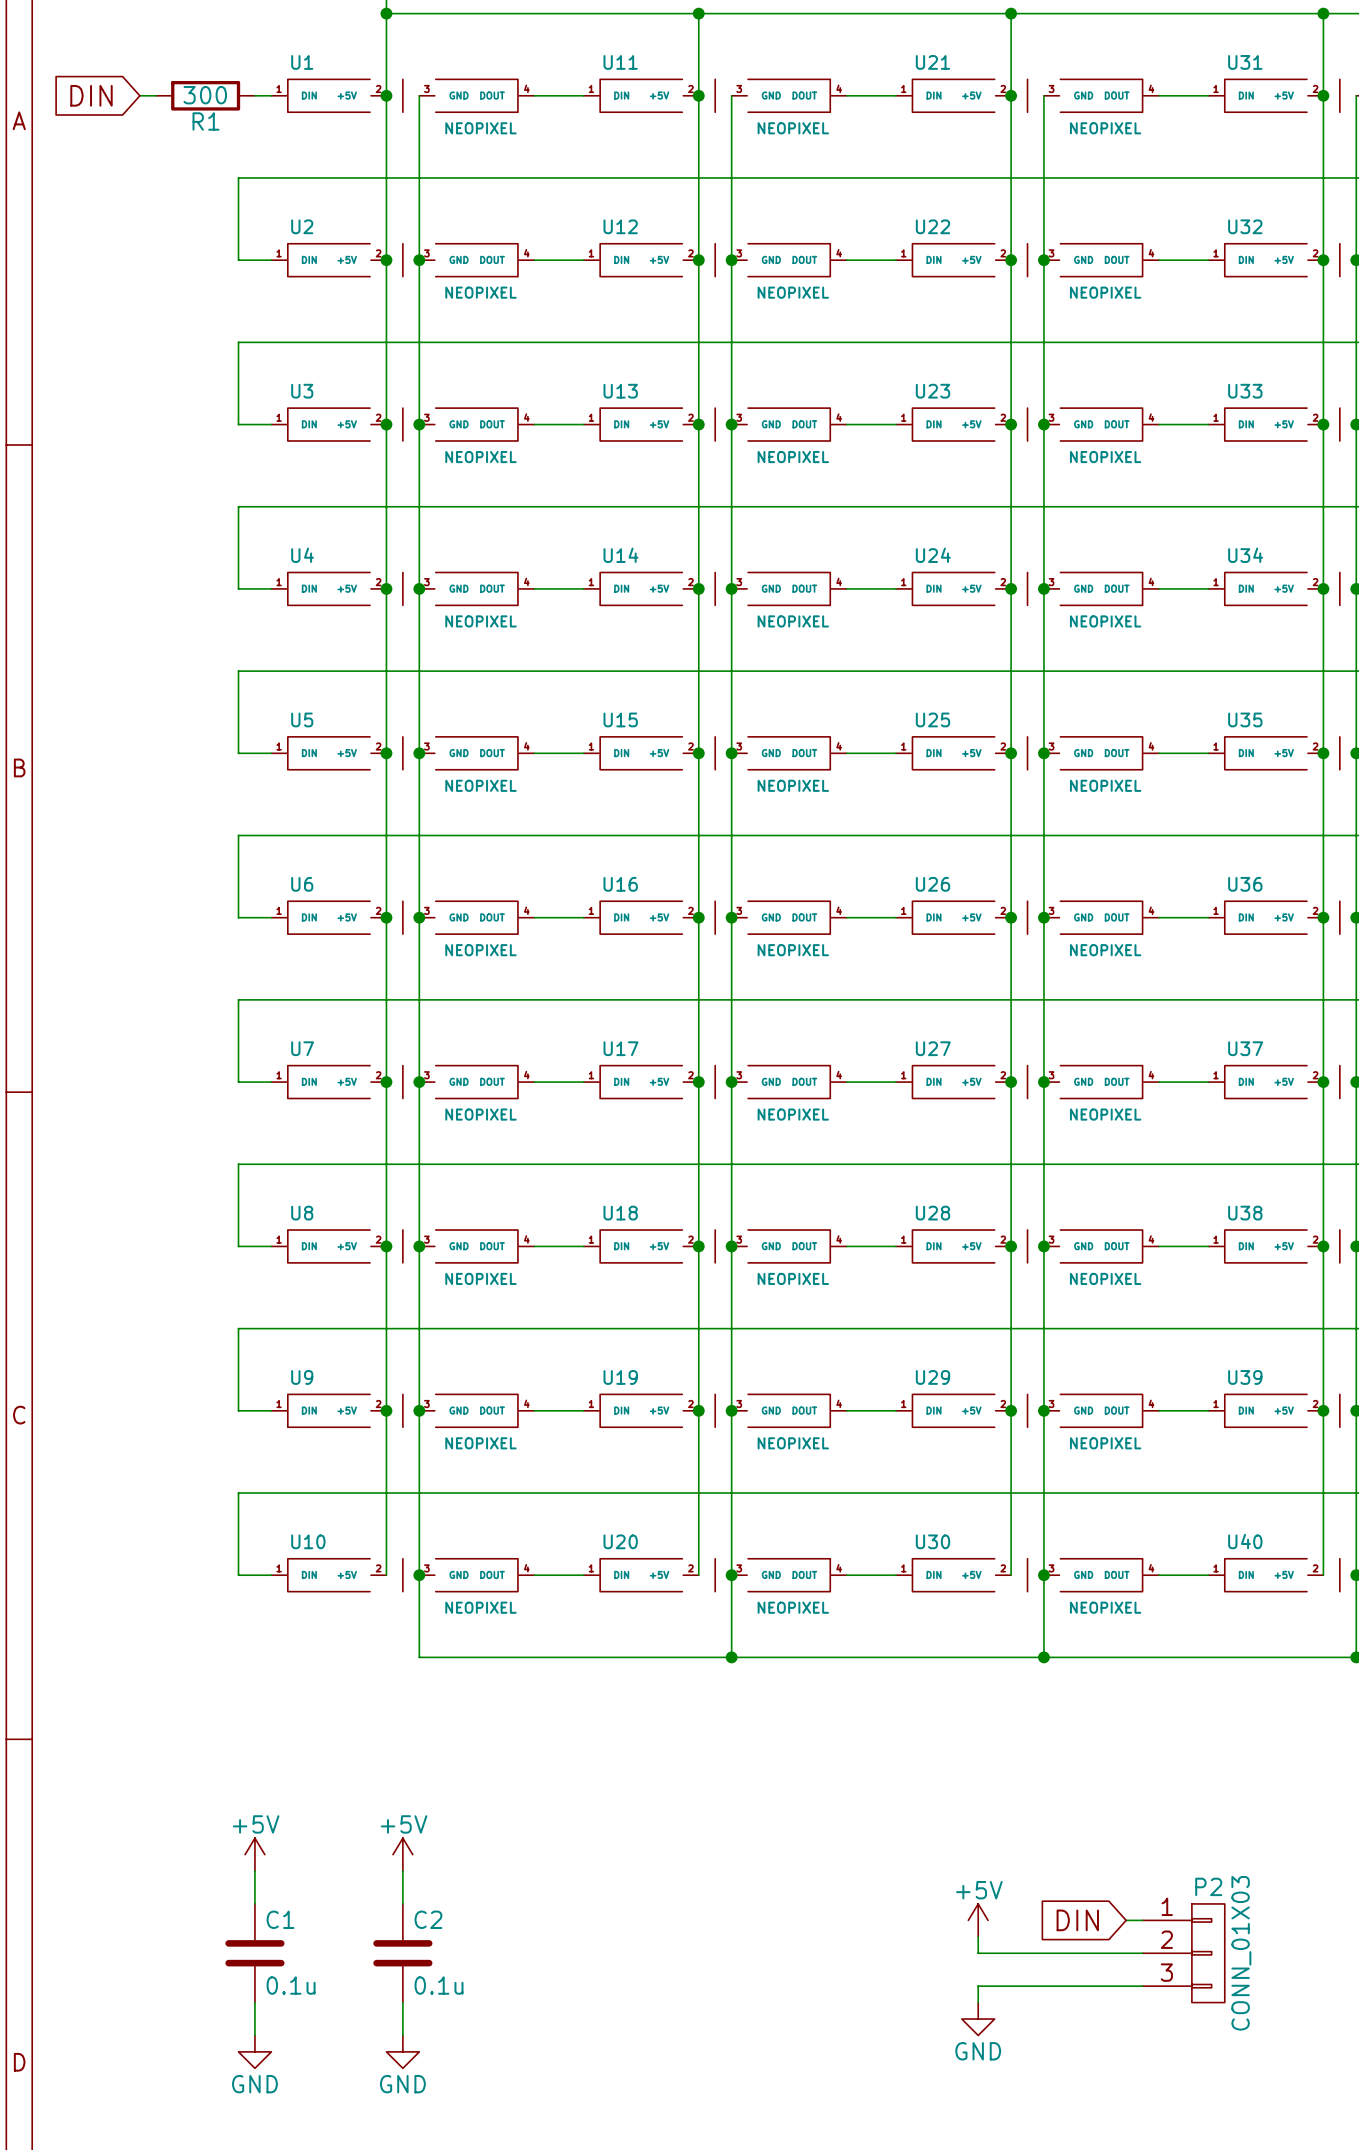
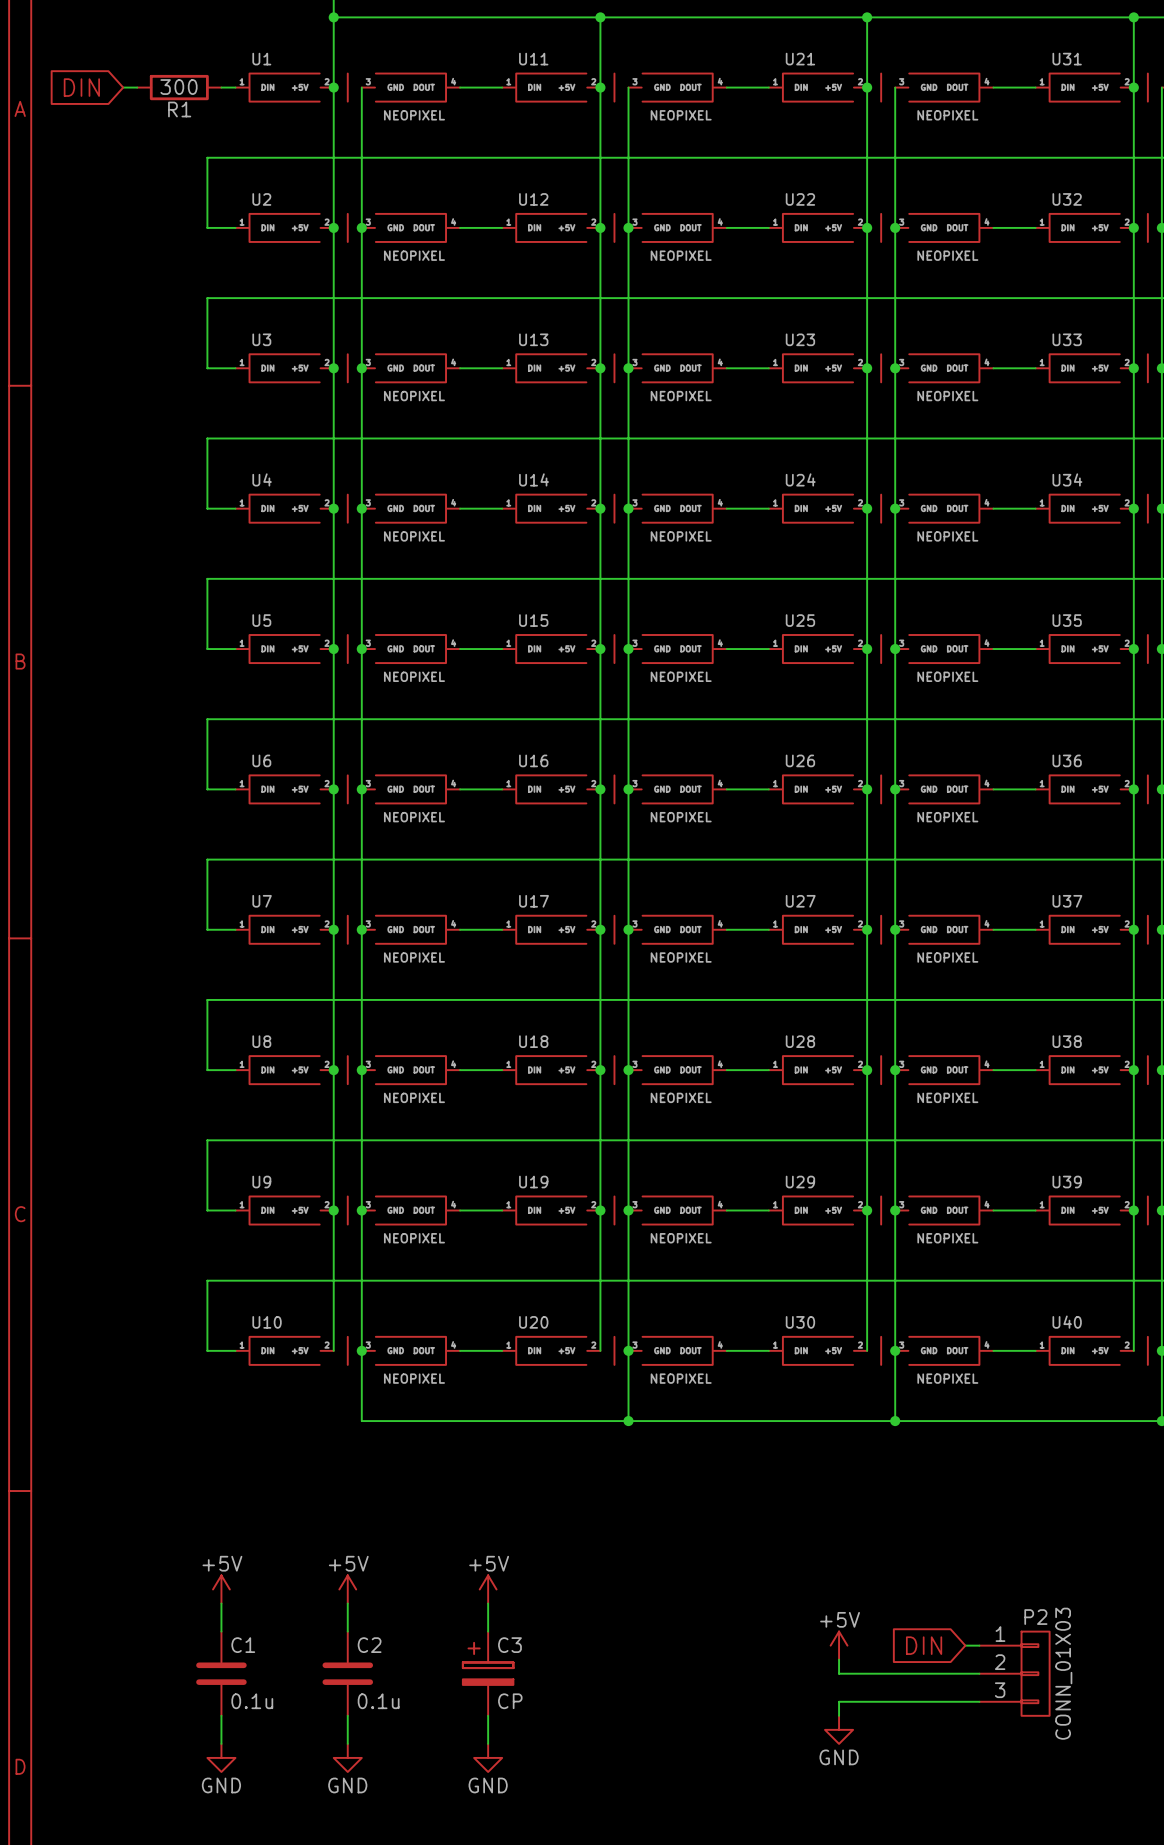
power symbol: none -> +5V (488, 1589)
wire: none -> (488, 1603) (488, 1631)
C3: none -> CP (488, 1673)
wire: none -> (488, 1715) (488, 1743)
power symbol: none -> GND (488, 1757)

